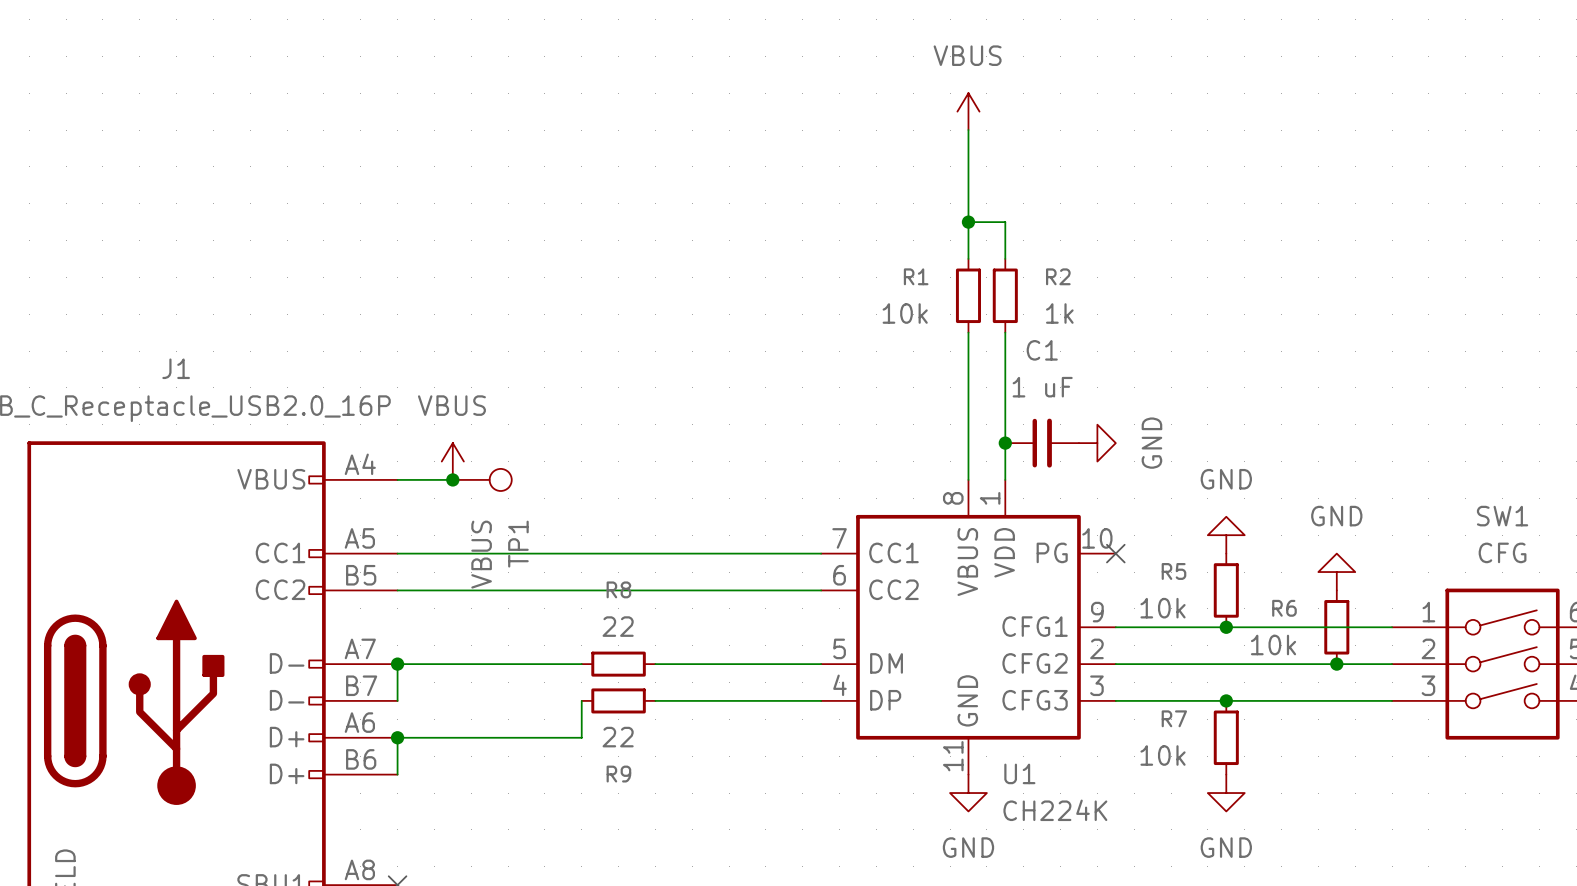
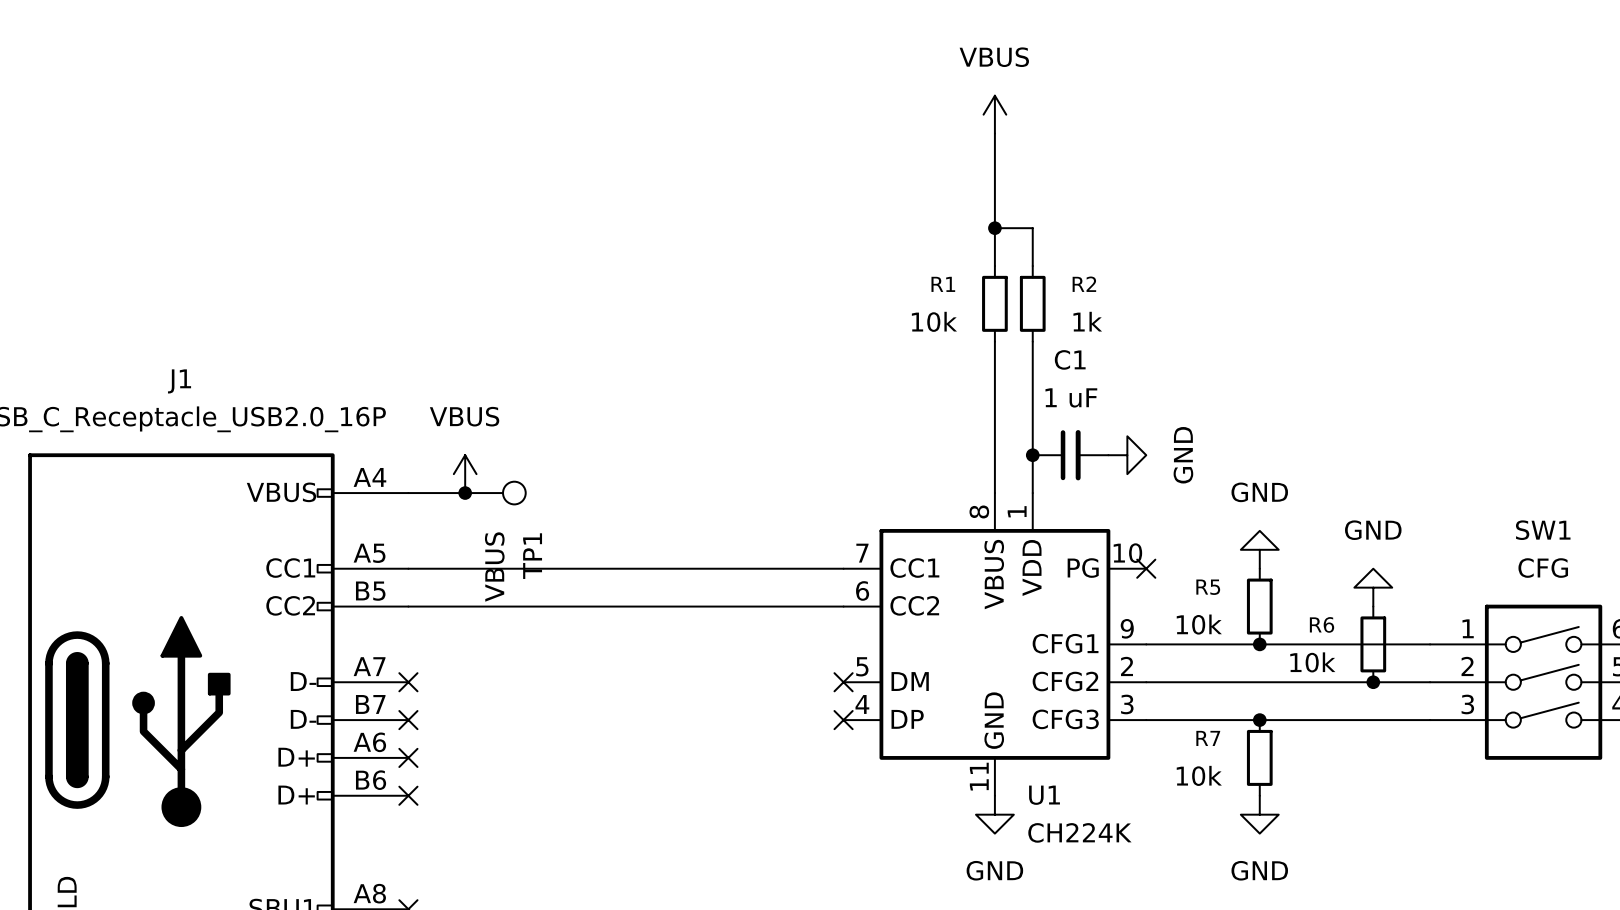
junction: (397, 664) -> none
no-connect mark: none -> (408, 682)
wire: (581, 664) (397, 664) (397, 700) -> none
R8: 22 (618, 664) -> none
wire: (655, 664) (821, 664) -> none
no-connect mark: none -> (843, 682)
no-connect mark: none -> (408, 720)
wire: (581, 700) (581, 737) (397, 737) (397, 774) -> none
R9: 22 (618, 700) -> none
wire: (655, 700) (821, 700) -> none
no-connect mark: none -> (843, 720)
junction: (397, 737) -> none
no-connect mark: none -> (408, 757)
no-connect mark: none -> (408, 795)

